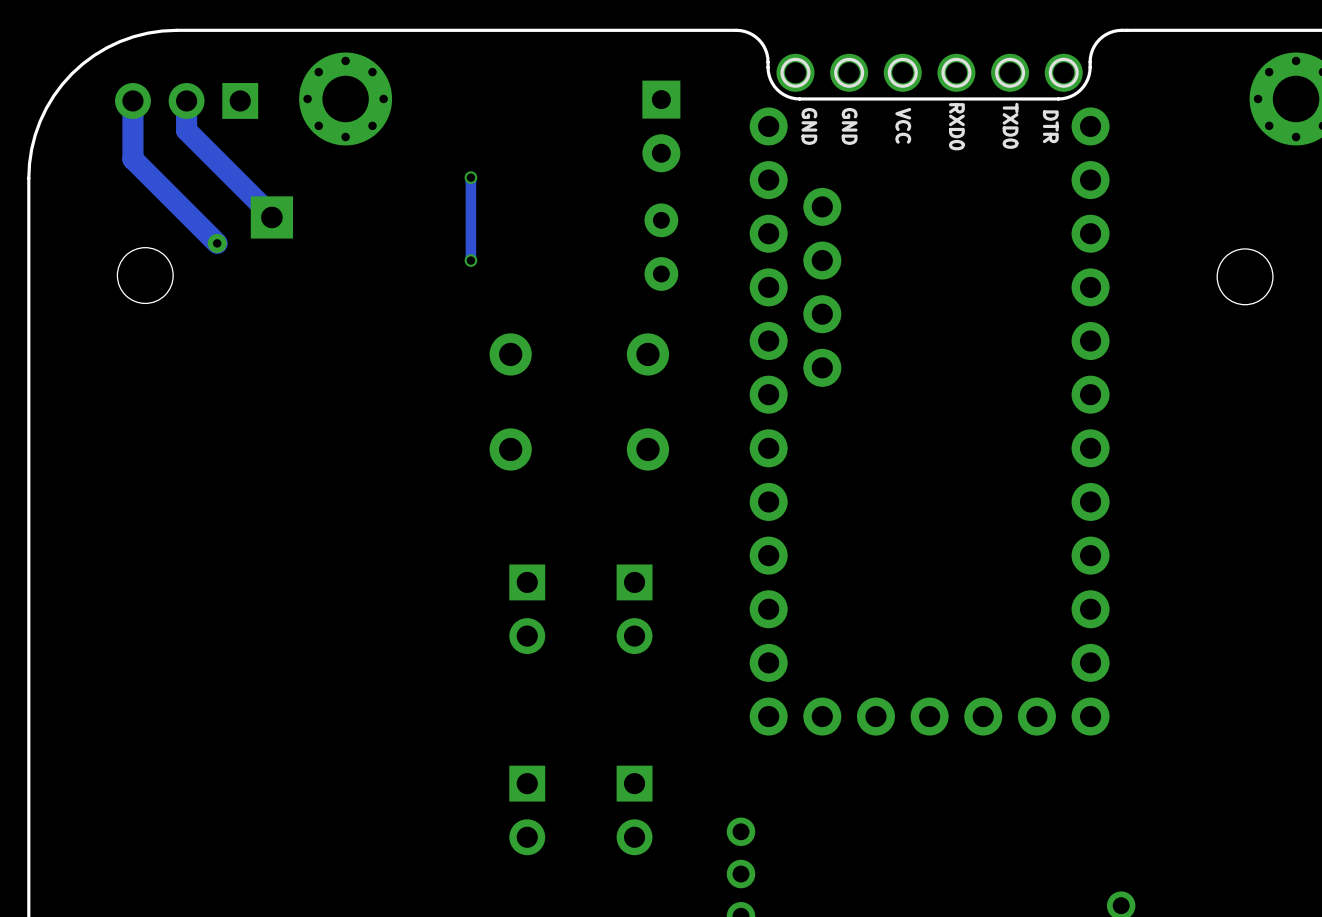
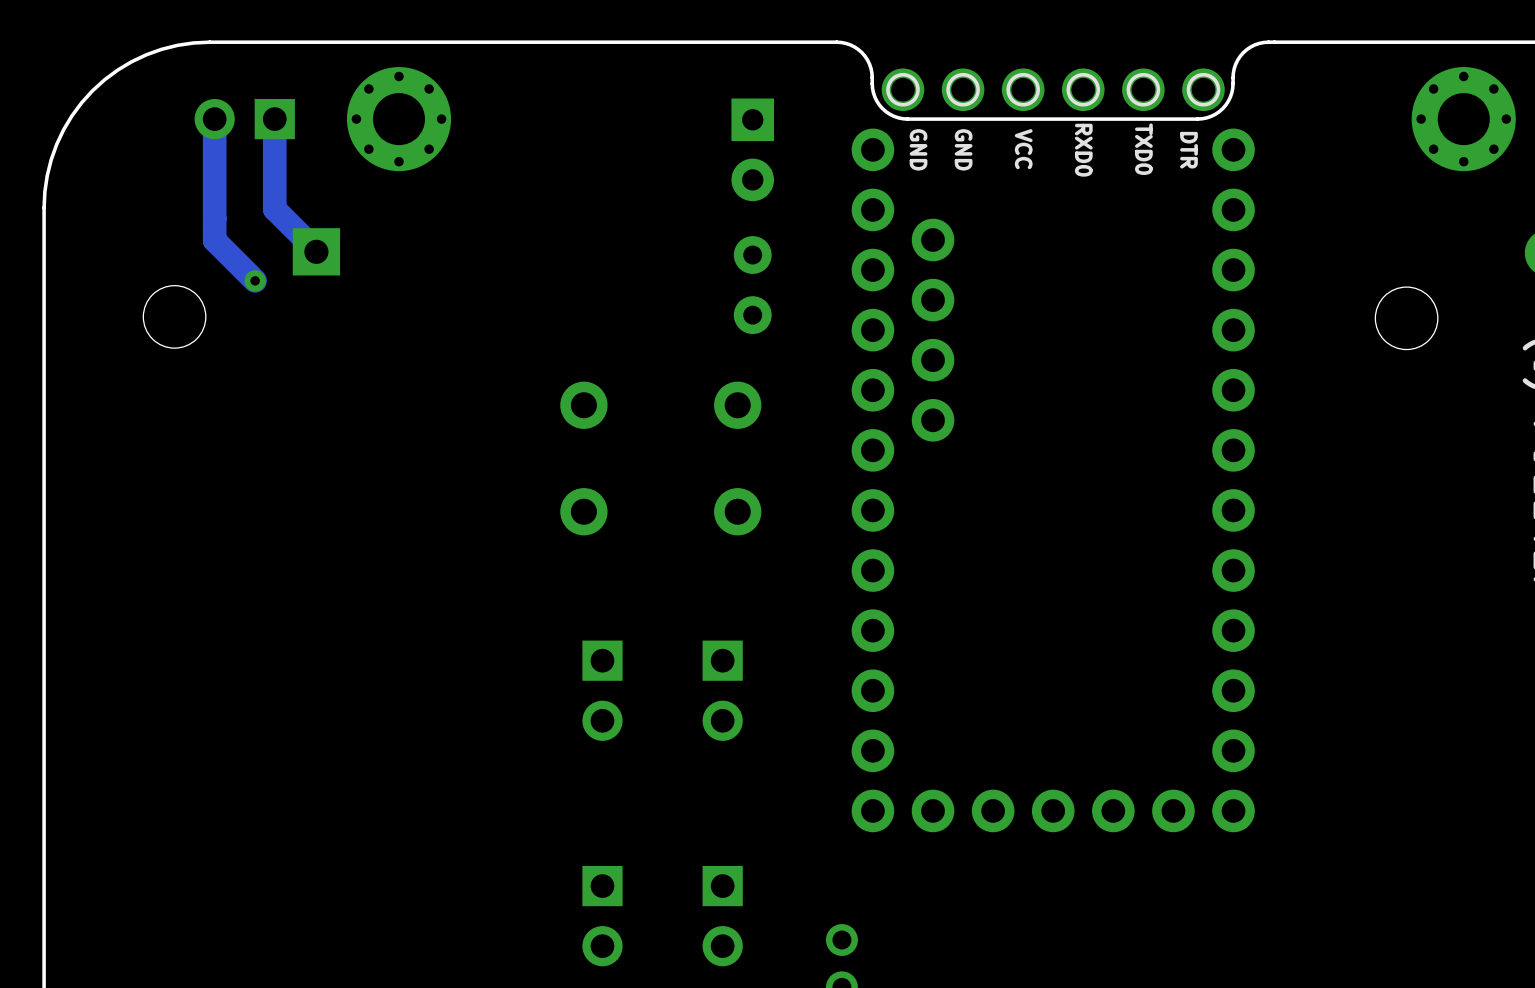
part: none -> (244, 119)
track: none -> (274, 119) (274, 209) (311, 246)
track: (132, 100) (132, 159) (181, 207) -> (214, 119) (214, 240)
track: (186, 100) (186, 130) (271, 214) -> none
part: (186, 100) -> none
track: (470, 177) (470, 260) -> none
via: (470, 177) -> none
via: (470, 260) -> none

